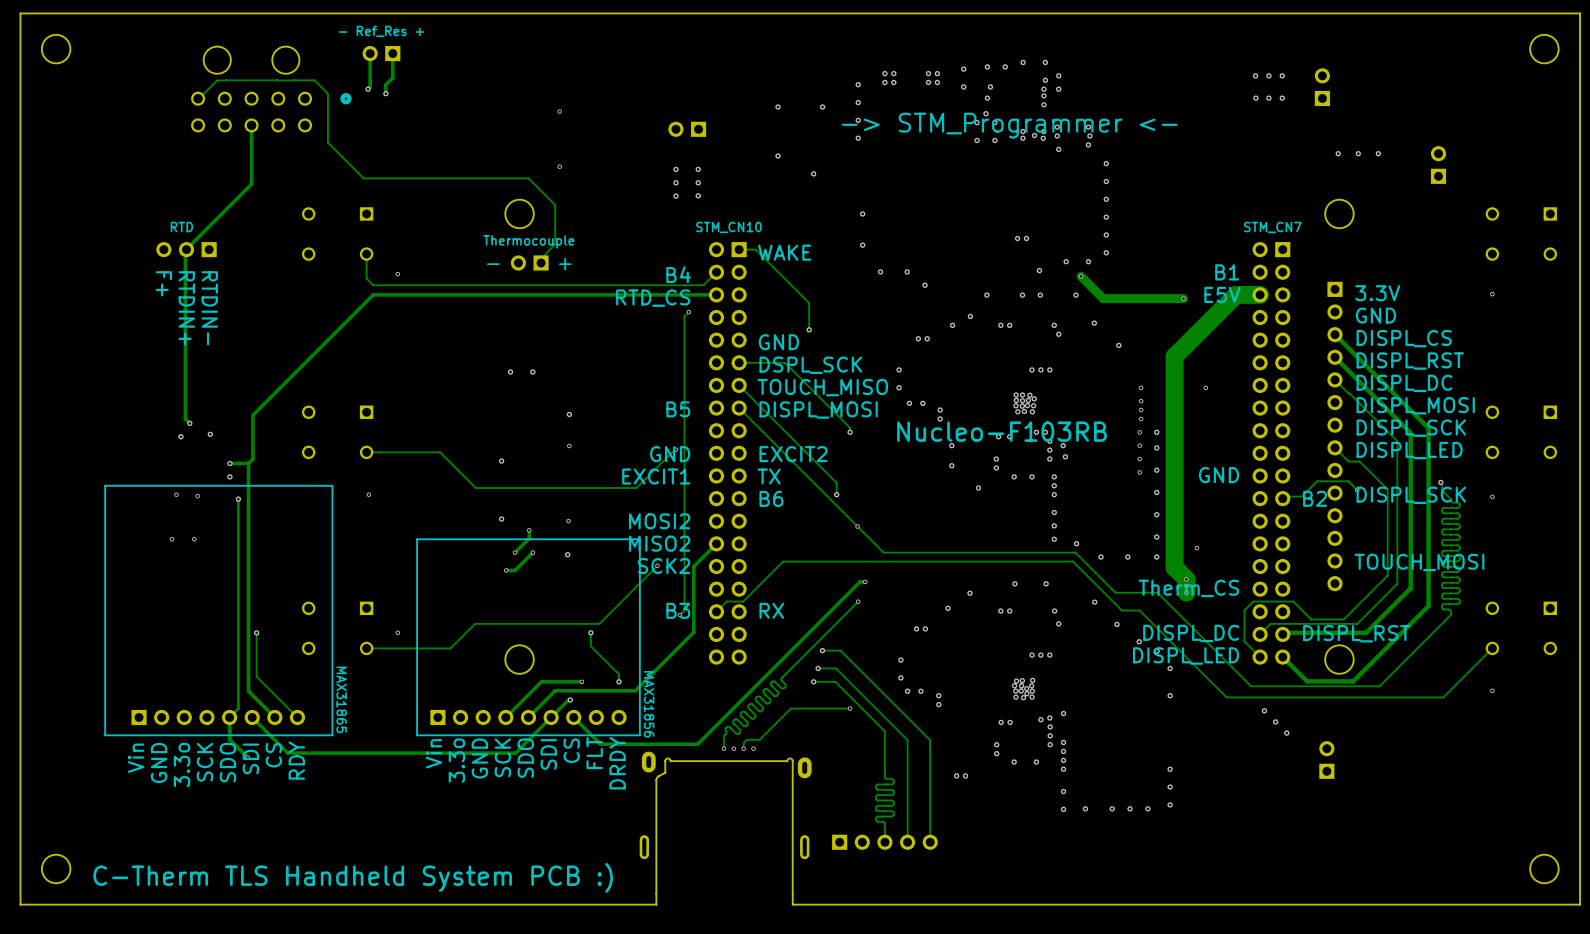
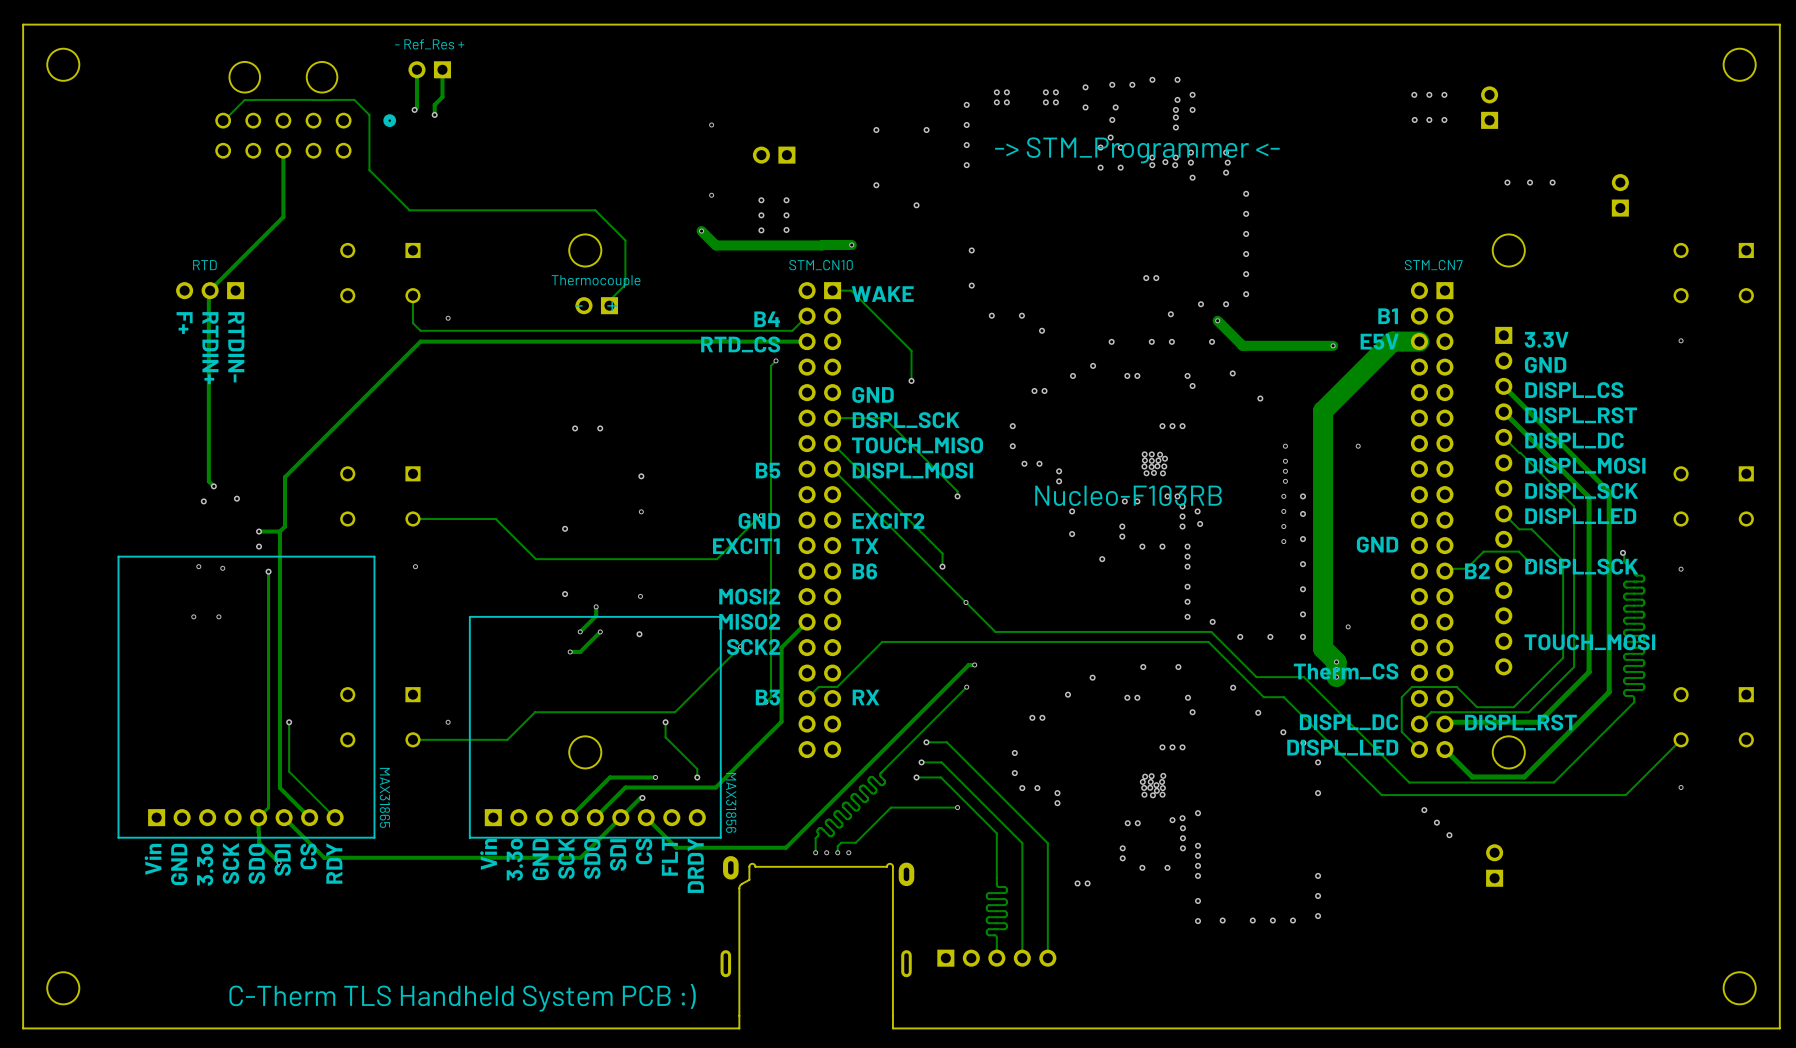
via: none -> (711, 124)
via: (559, 111) -> none
via: none -> (711, 195)
via: (559, 166) -> none
track: none -> (701, 231) (715, 245) (851, 245)
via: none -> (701, 231)
via: none -> (851, 245)

